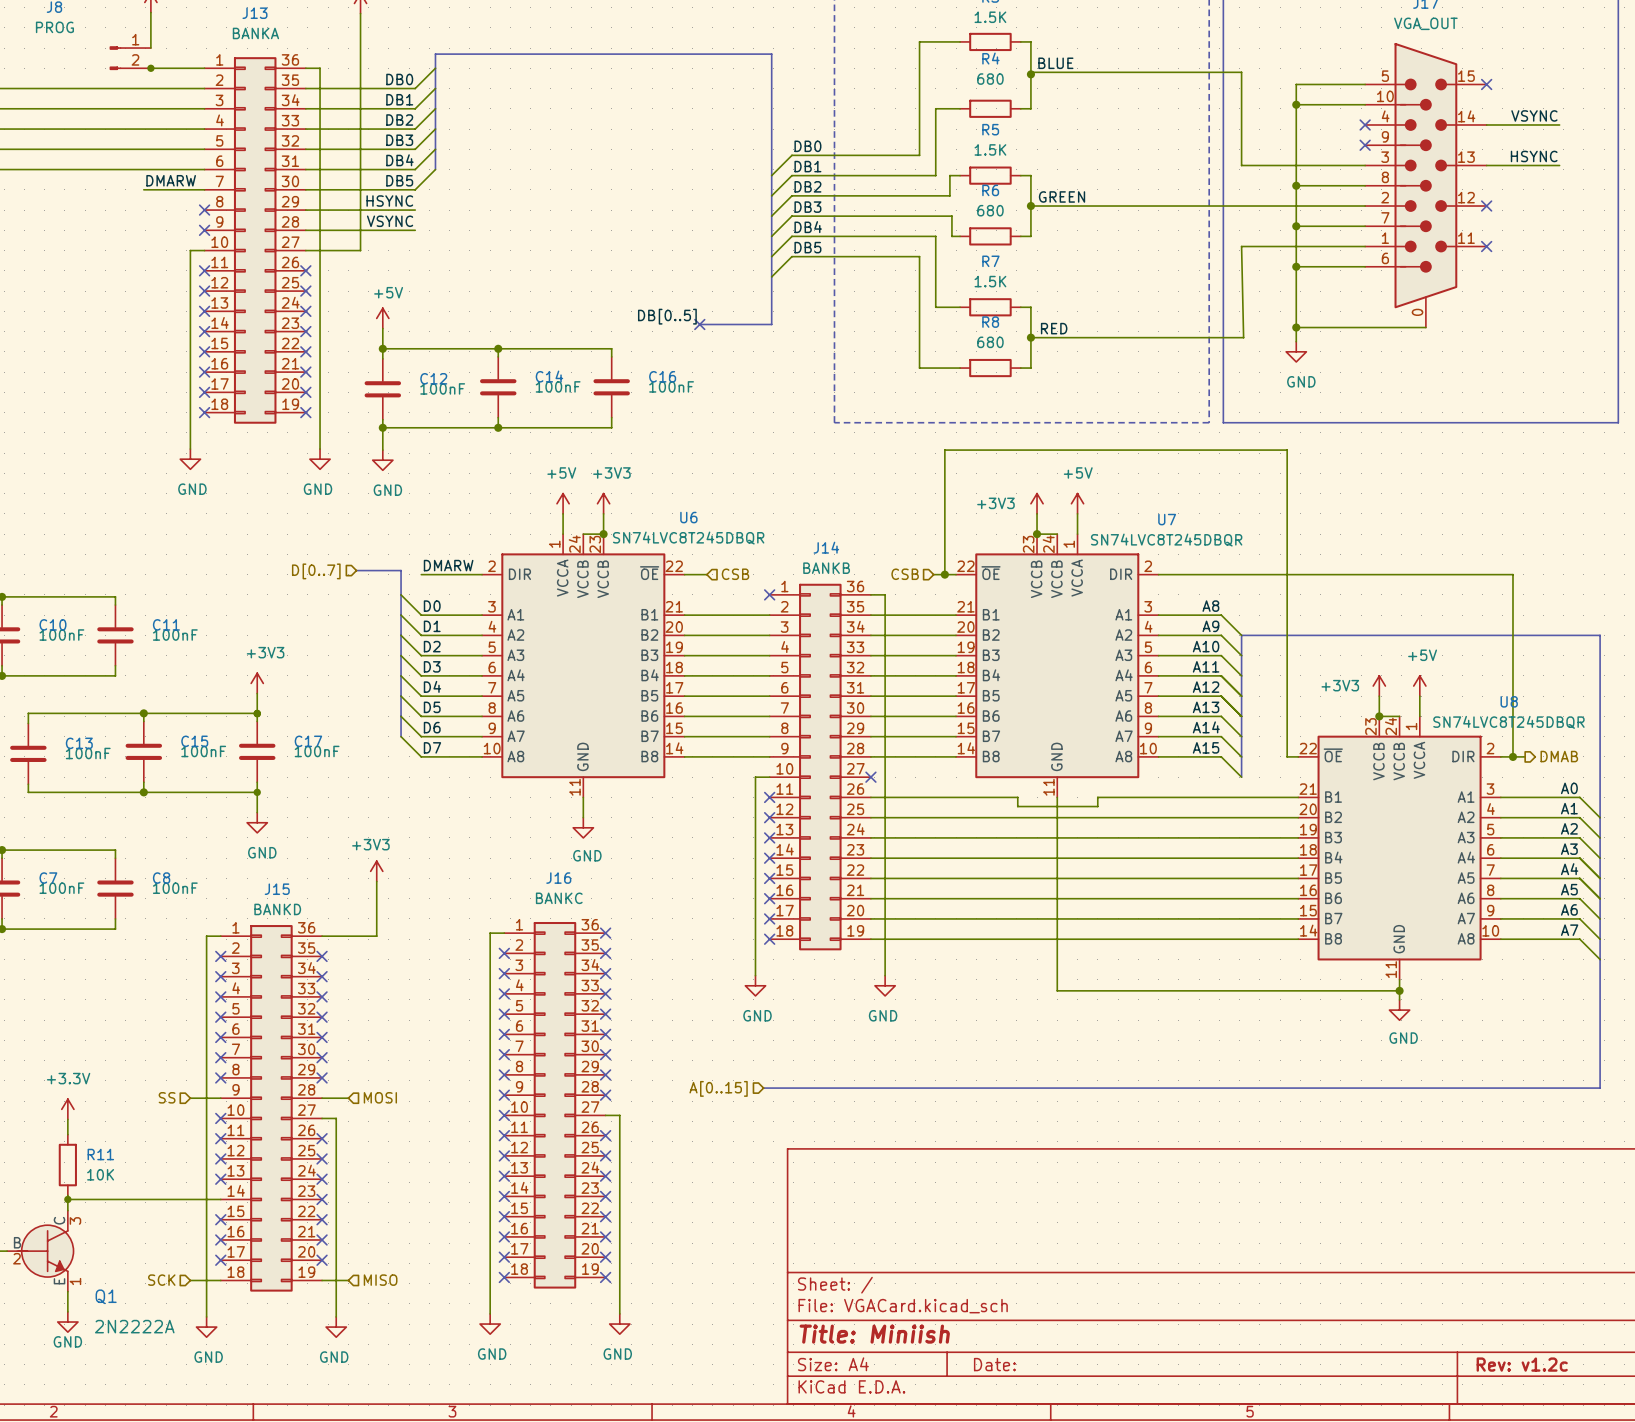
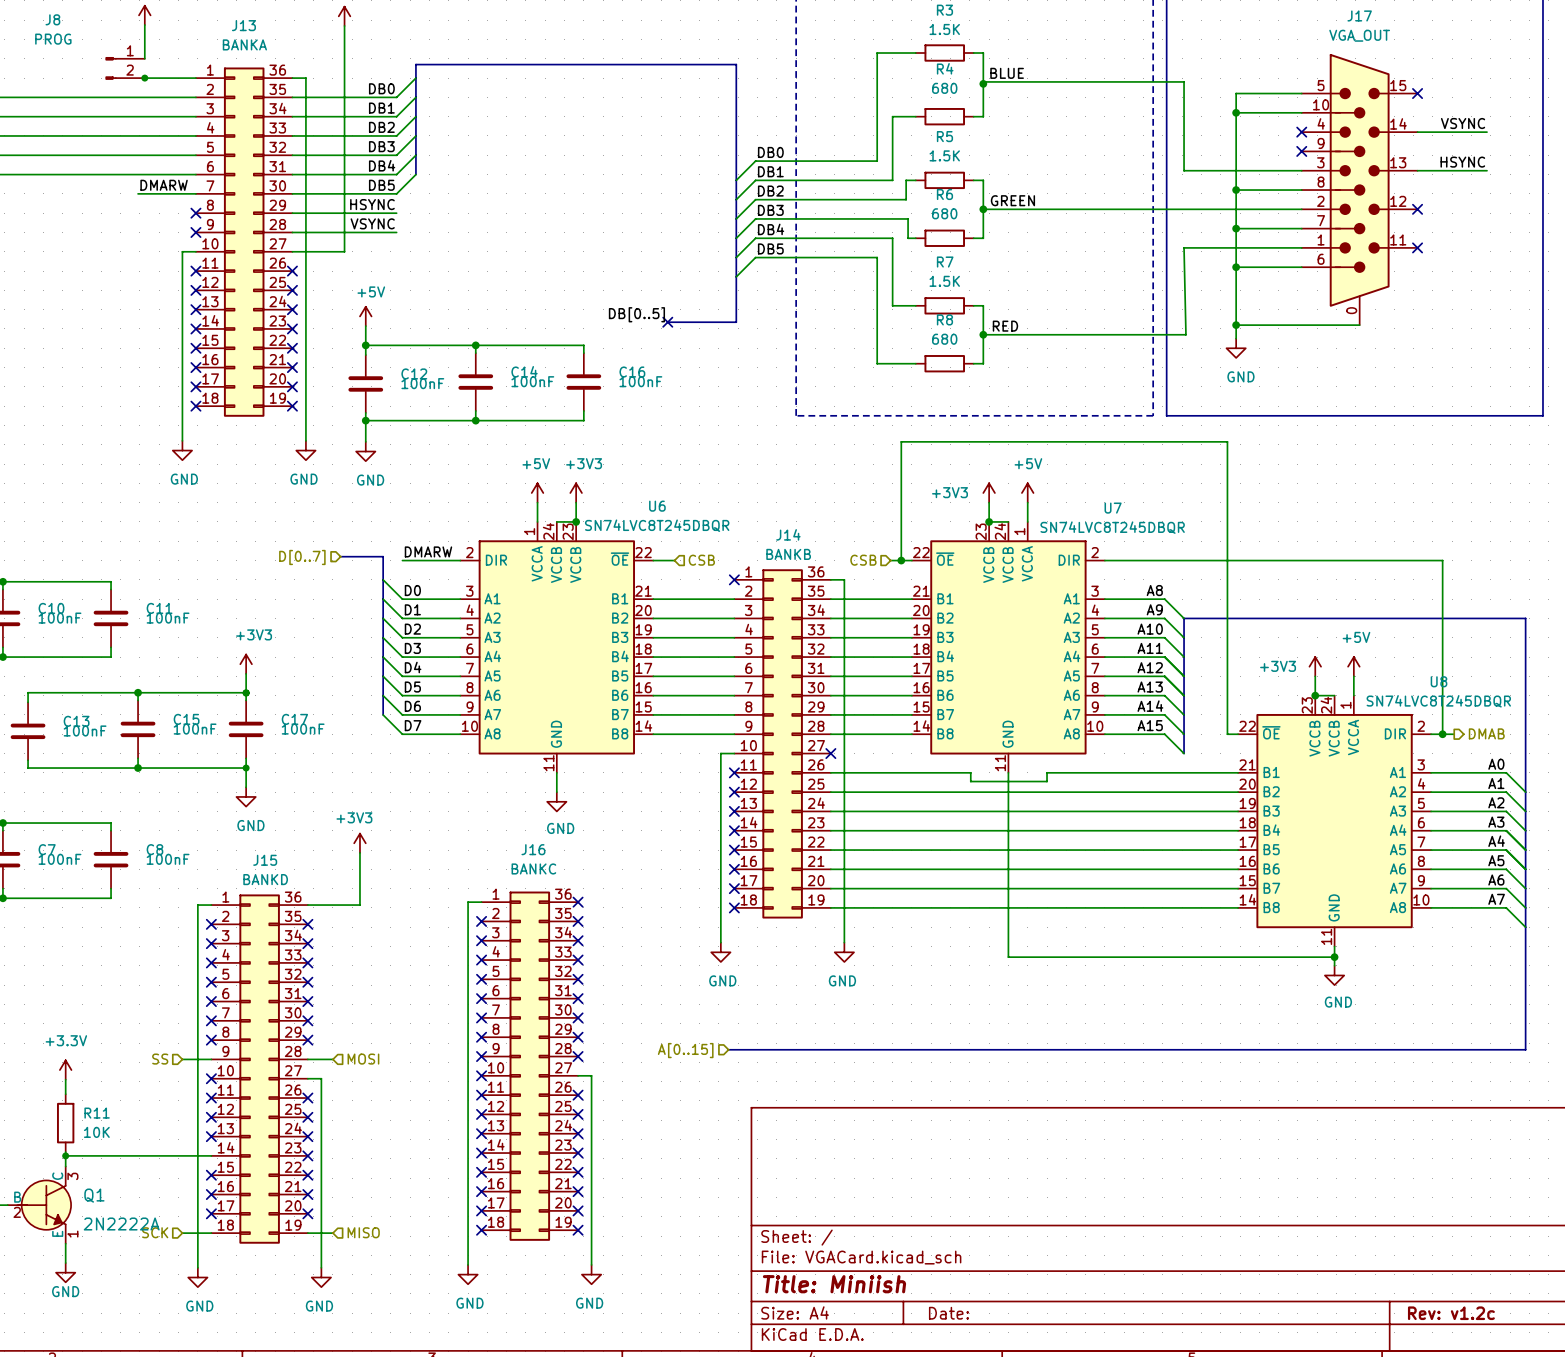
Q1 name position: Q1 (106, 1296) -> Q1 (94, 1195)
Q1 value position: 2N2222A (134, 1326) -> 2N2222A (121, 1223)

